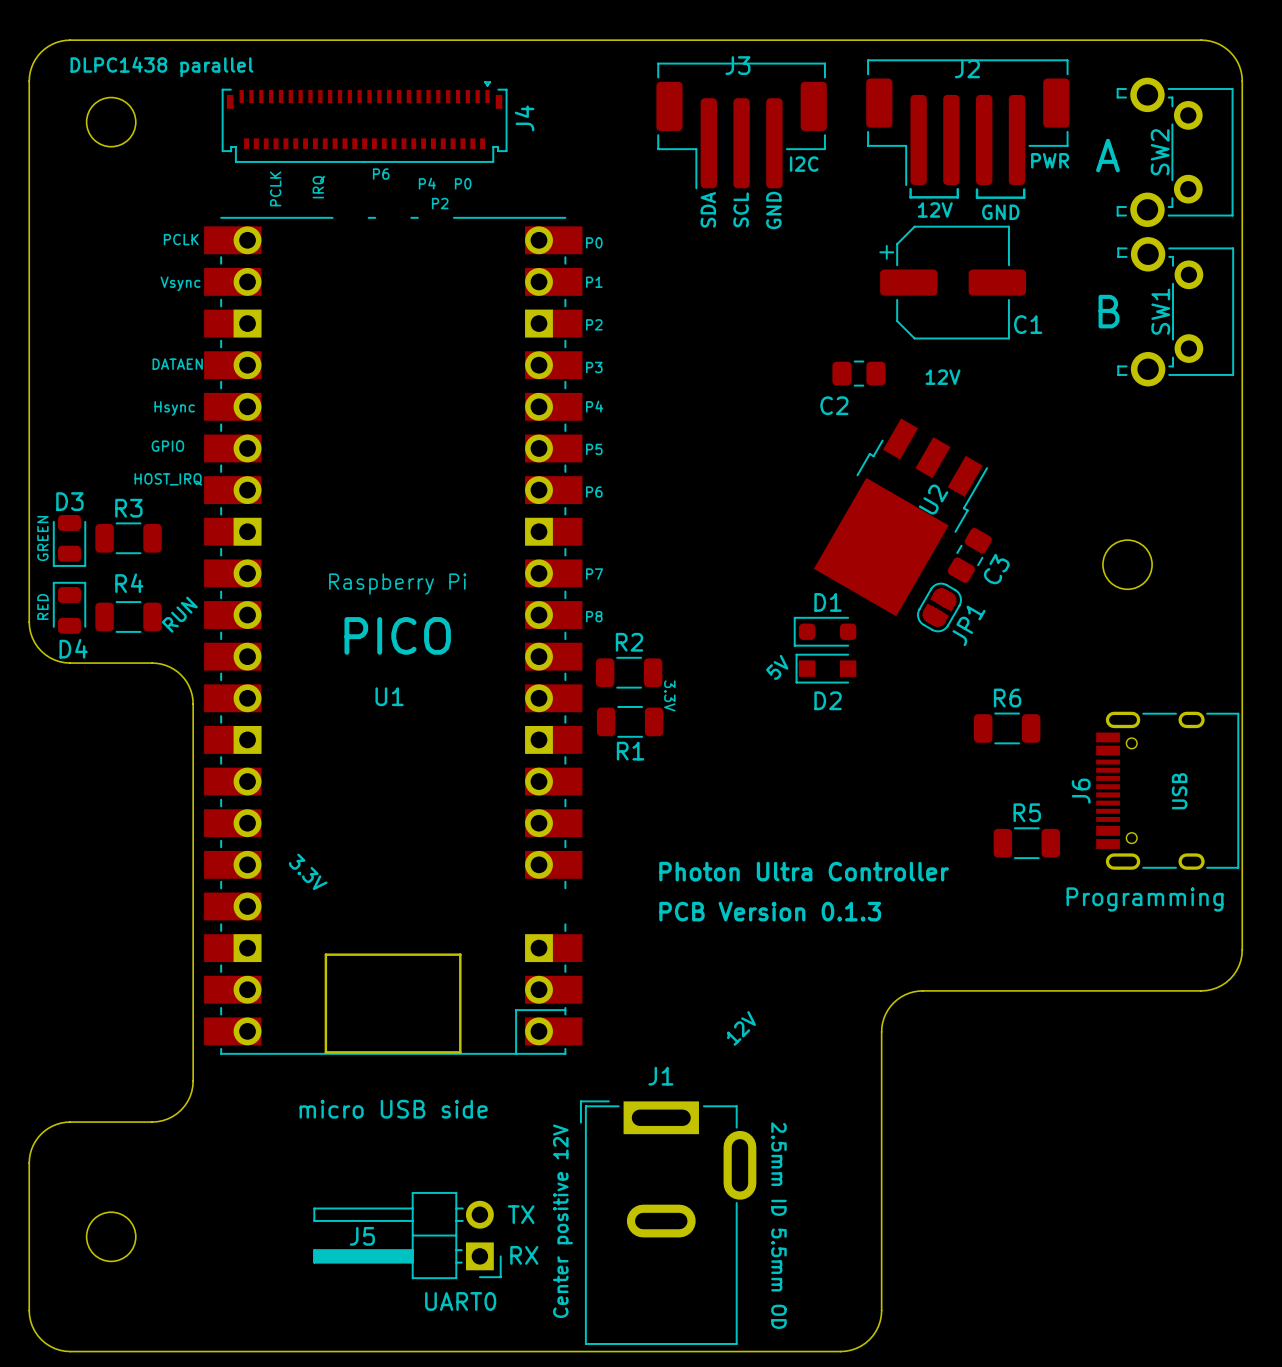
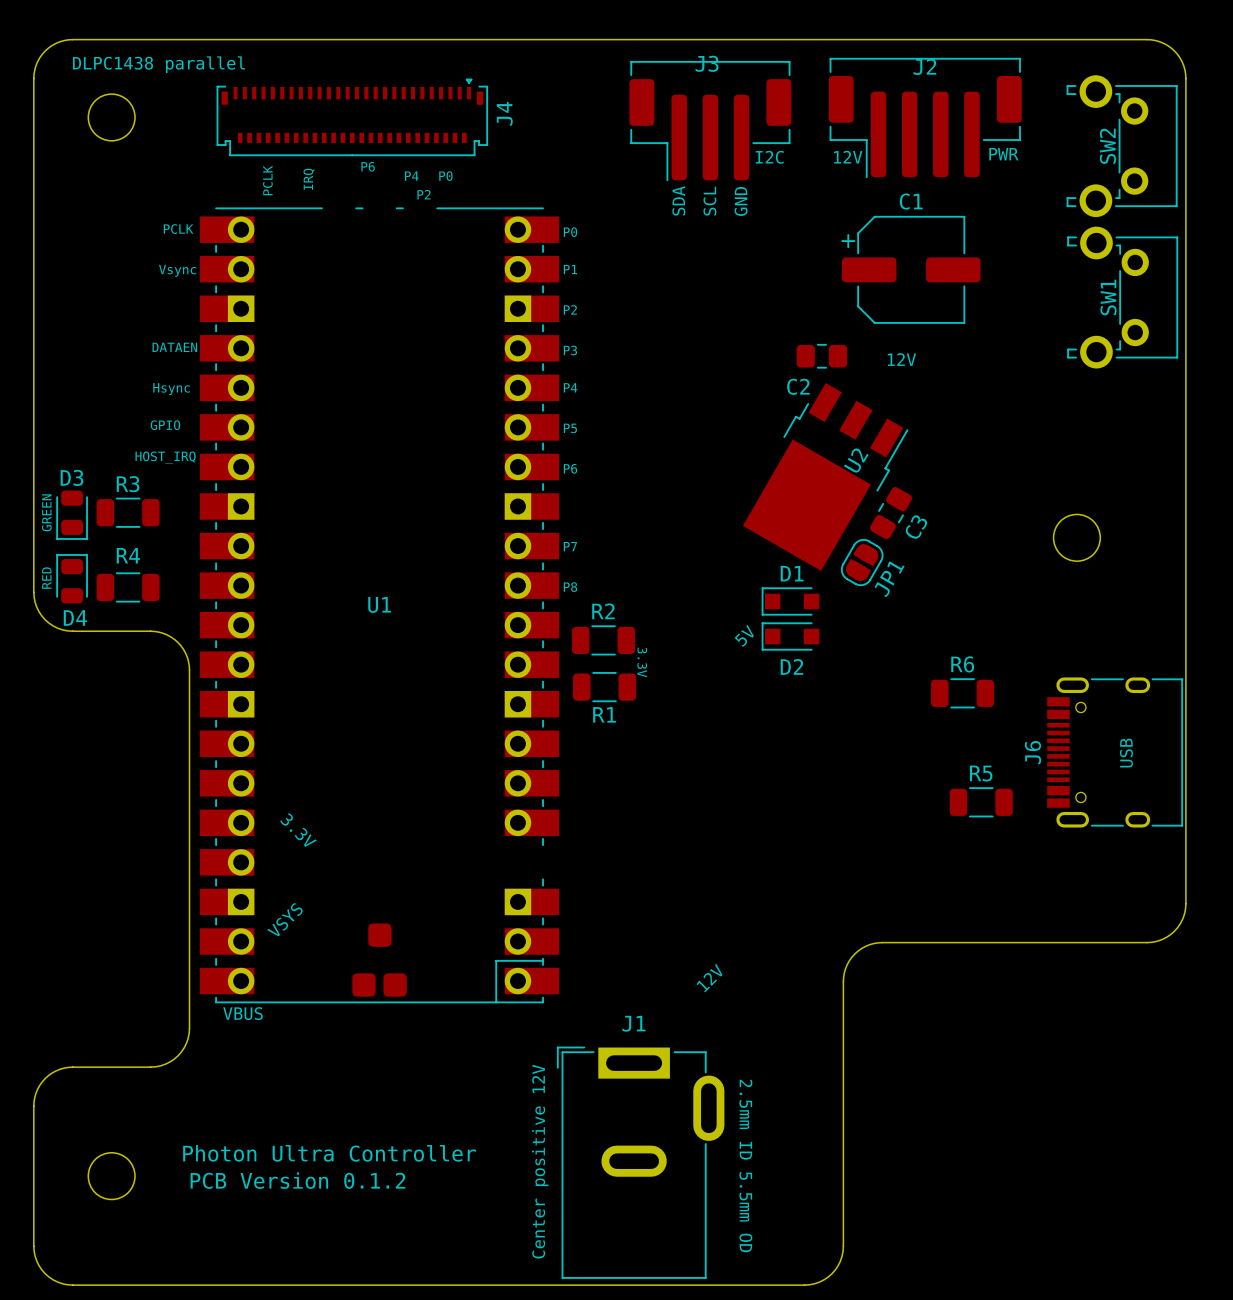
text: A (1107, 155) -> none
line: (910, 189) (910, 197) (957, 197) (957, 189) -> none
line: (976, 189) (976, 197) (1024, 197) (1024, 189) -> none
text position: 12V (935, 209) -> 12V (848, 157)
text: GND (1000, 212) -> none
U1 footprint: [204, 216, 583, 1055] -> [199, 207, 560, 1004]
text: B (1109, 311) -> none
C1 name position: C1 (1028, 324) -> C1 (911, 201)
U2 position: (900, 517) -> (825, 477)
C3 position: (969, 555) -> (891, 513)
JP1 position: (939, 607) -> (862, 562)
D1 footprint: [793, 616, 857, 647] -> [761, 587, 820, 616]
U1 name position: U1 (389, 696) -> U1 (379, 604)
text: Photon Ultra Controller (804, 871) -> none
text: Programming (1145, 899) -> none
text: PCB Version 0.1.3 (770, 911) -> none
board edge: (325, 954) (460, 954) (460, 1052) (325, 1052) (325, 954) -> none
text: none -> Photon Ultra Controller (329, 1153)
text: TX (521, 1214) -> none
J5: (407, 1235) -> none
text: none -> PCB Version 0.1.2 (297, 1180)
text: RX (524, 1255) -> none
text: UART0 (460, 1301) -> none

